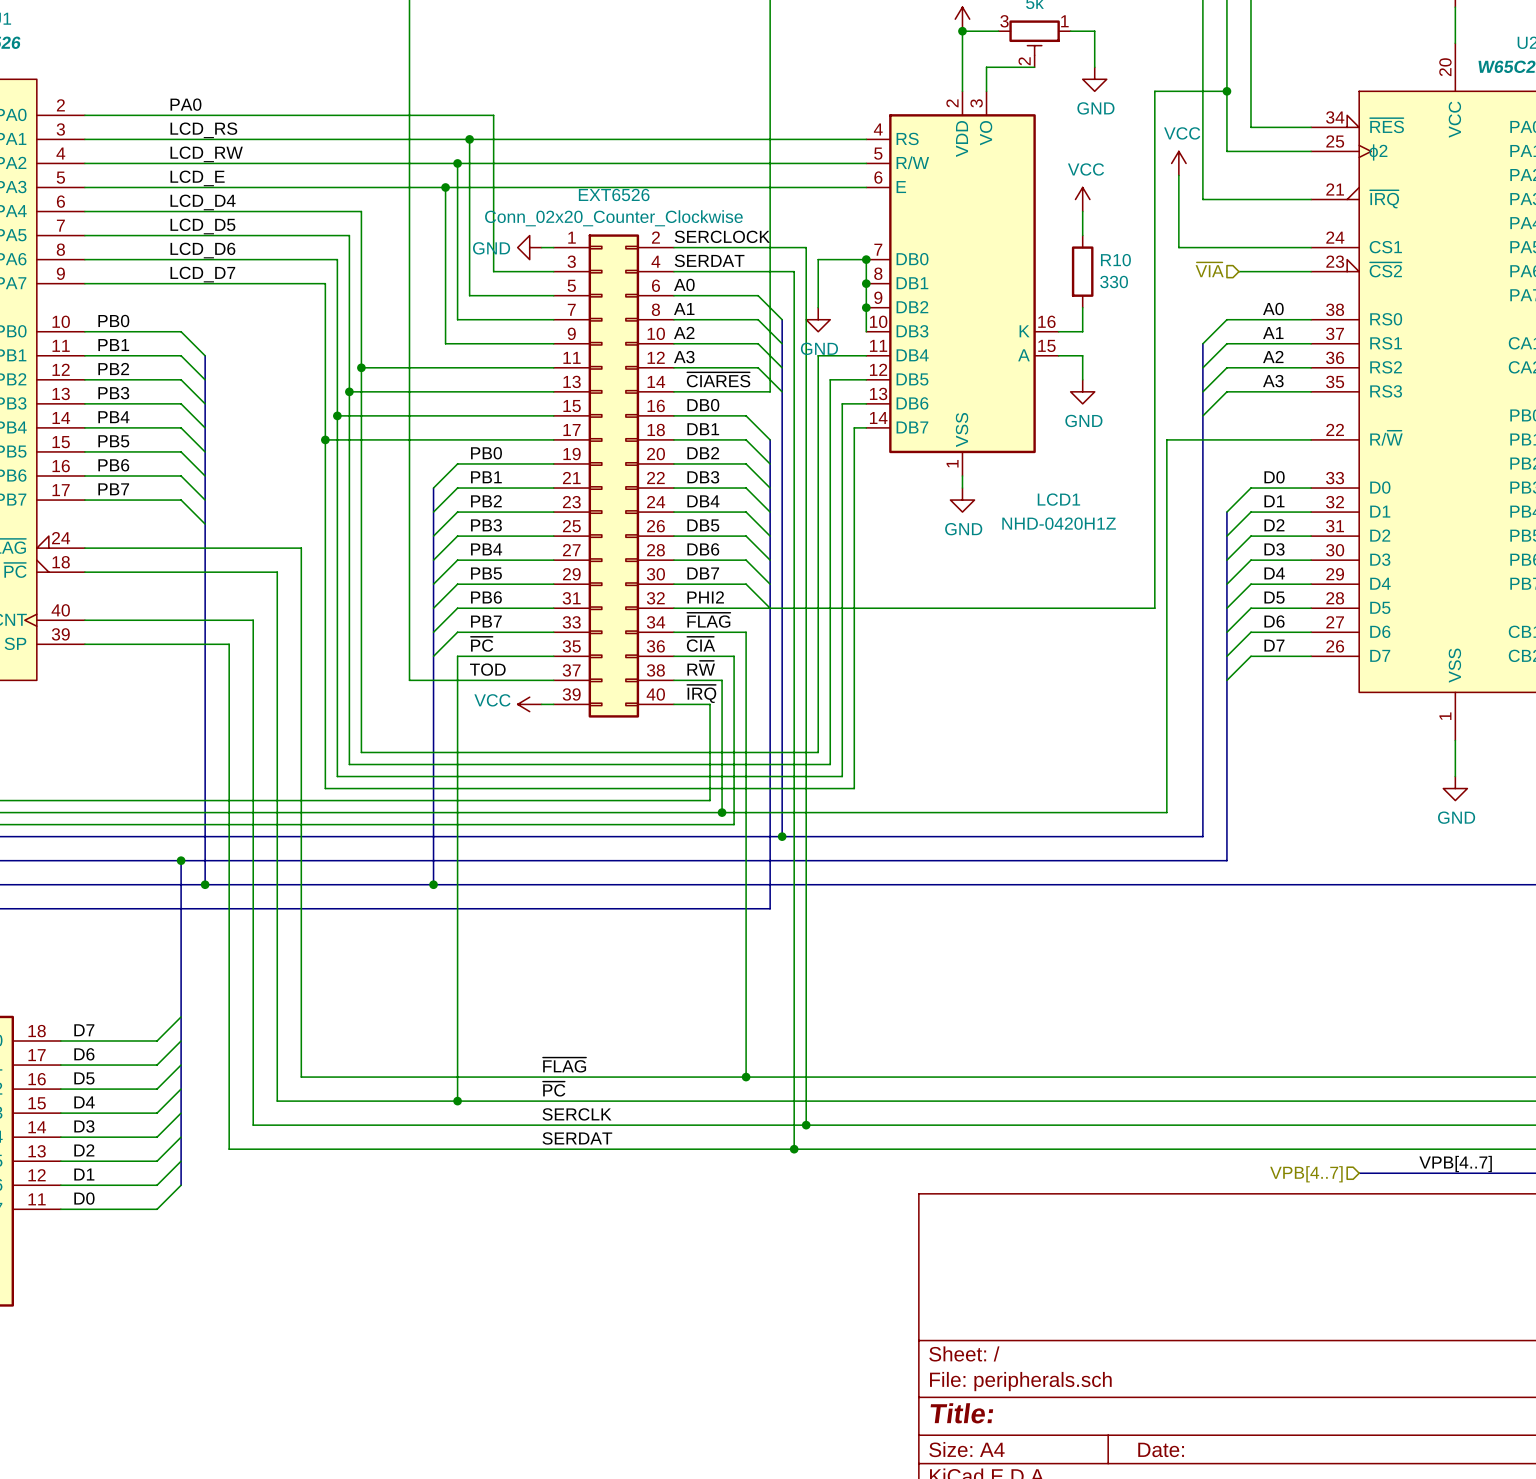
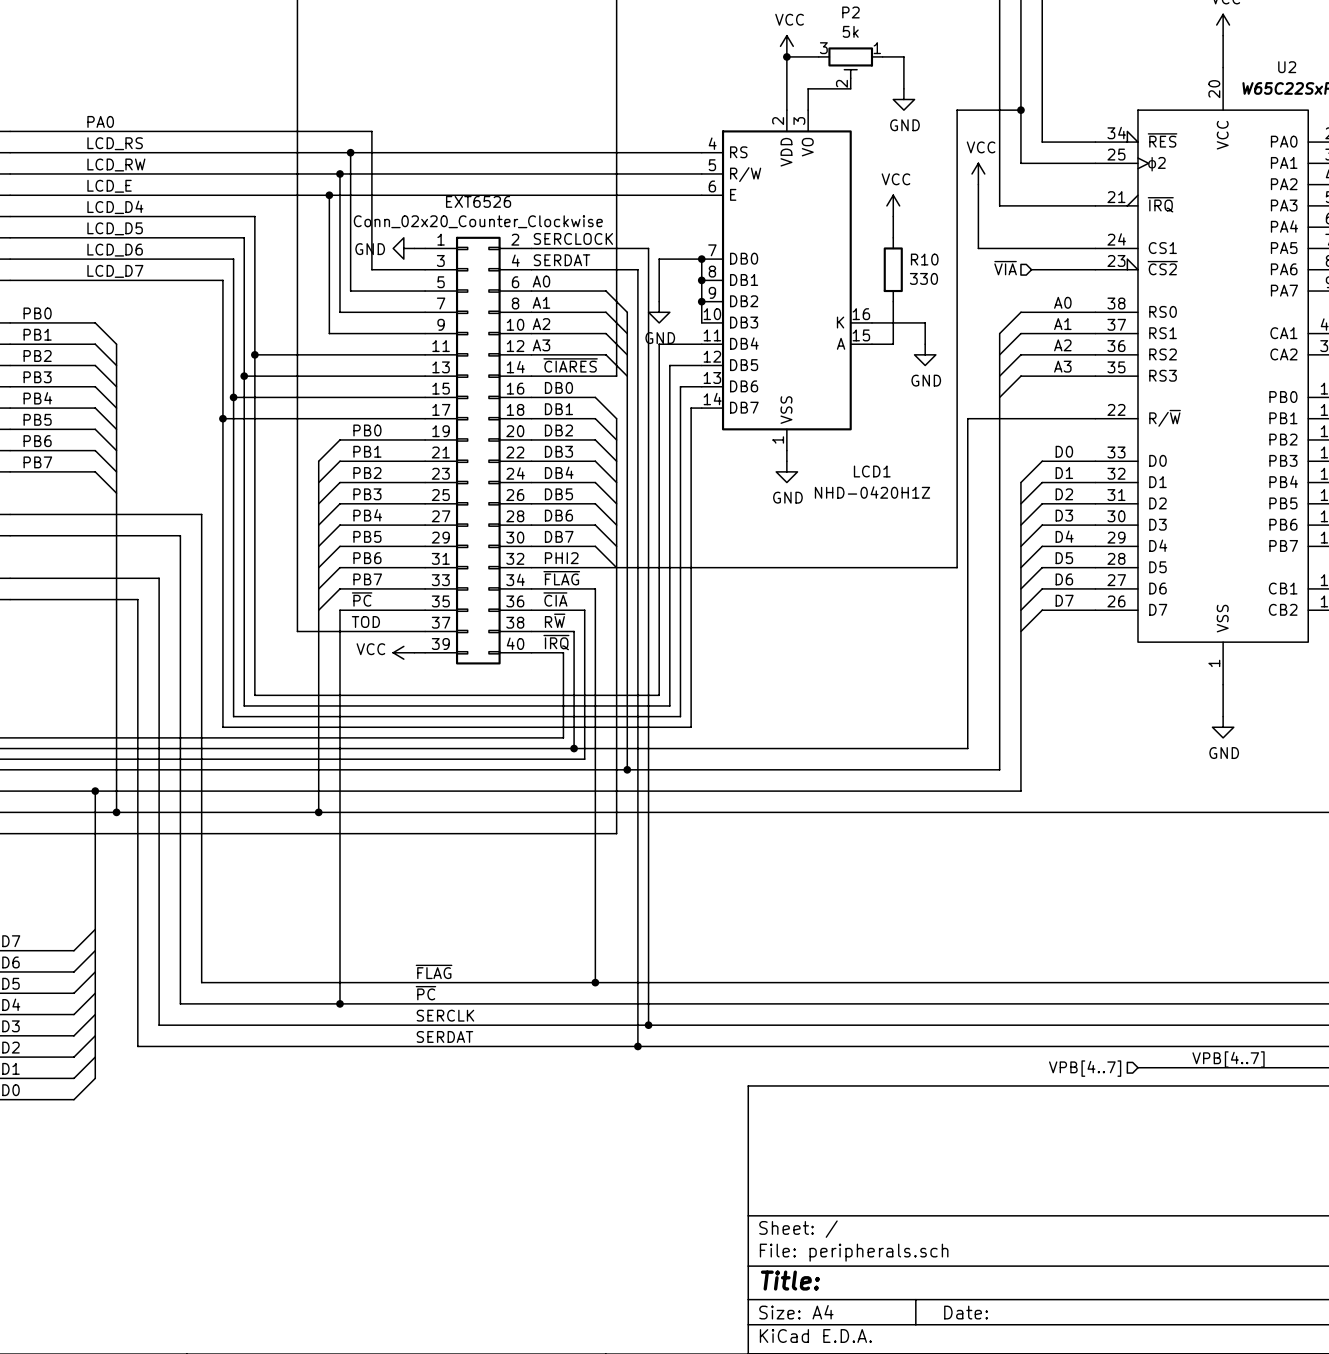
wire: (1082, 355) (1082, 379) -> (893, 344) (893, 322) (925, 322) (925, 344)
power symbol position: GND (1082, 391) -> GND (925, 354)

